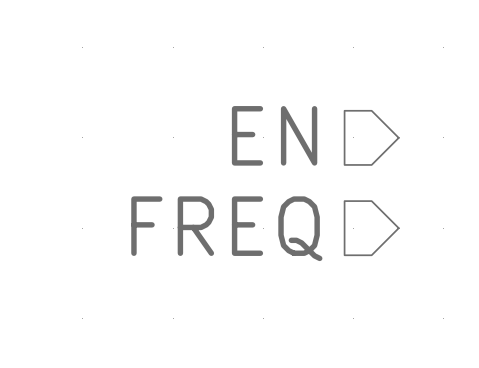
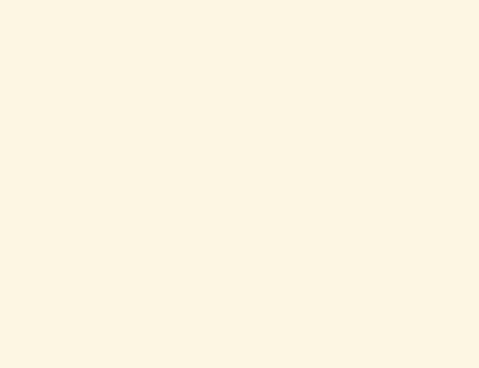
hierarchical label: EN (274, 135) -> none
hierarchical label: FREQ (226, 228) -> none

